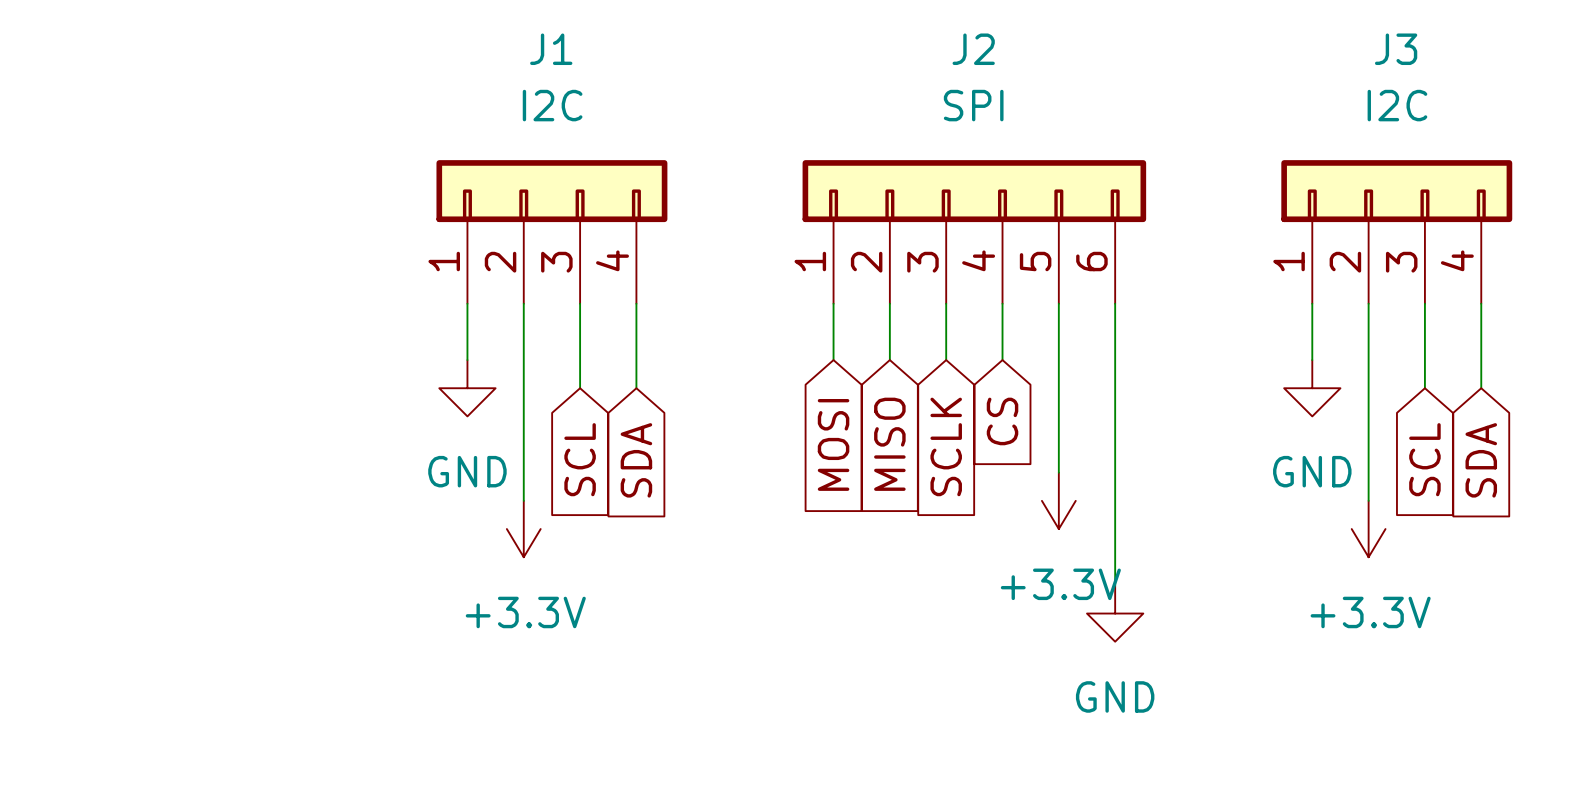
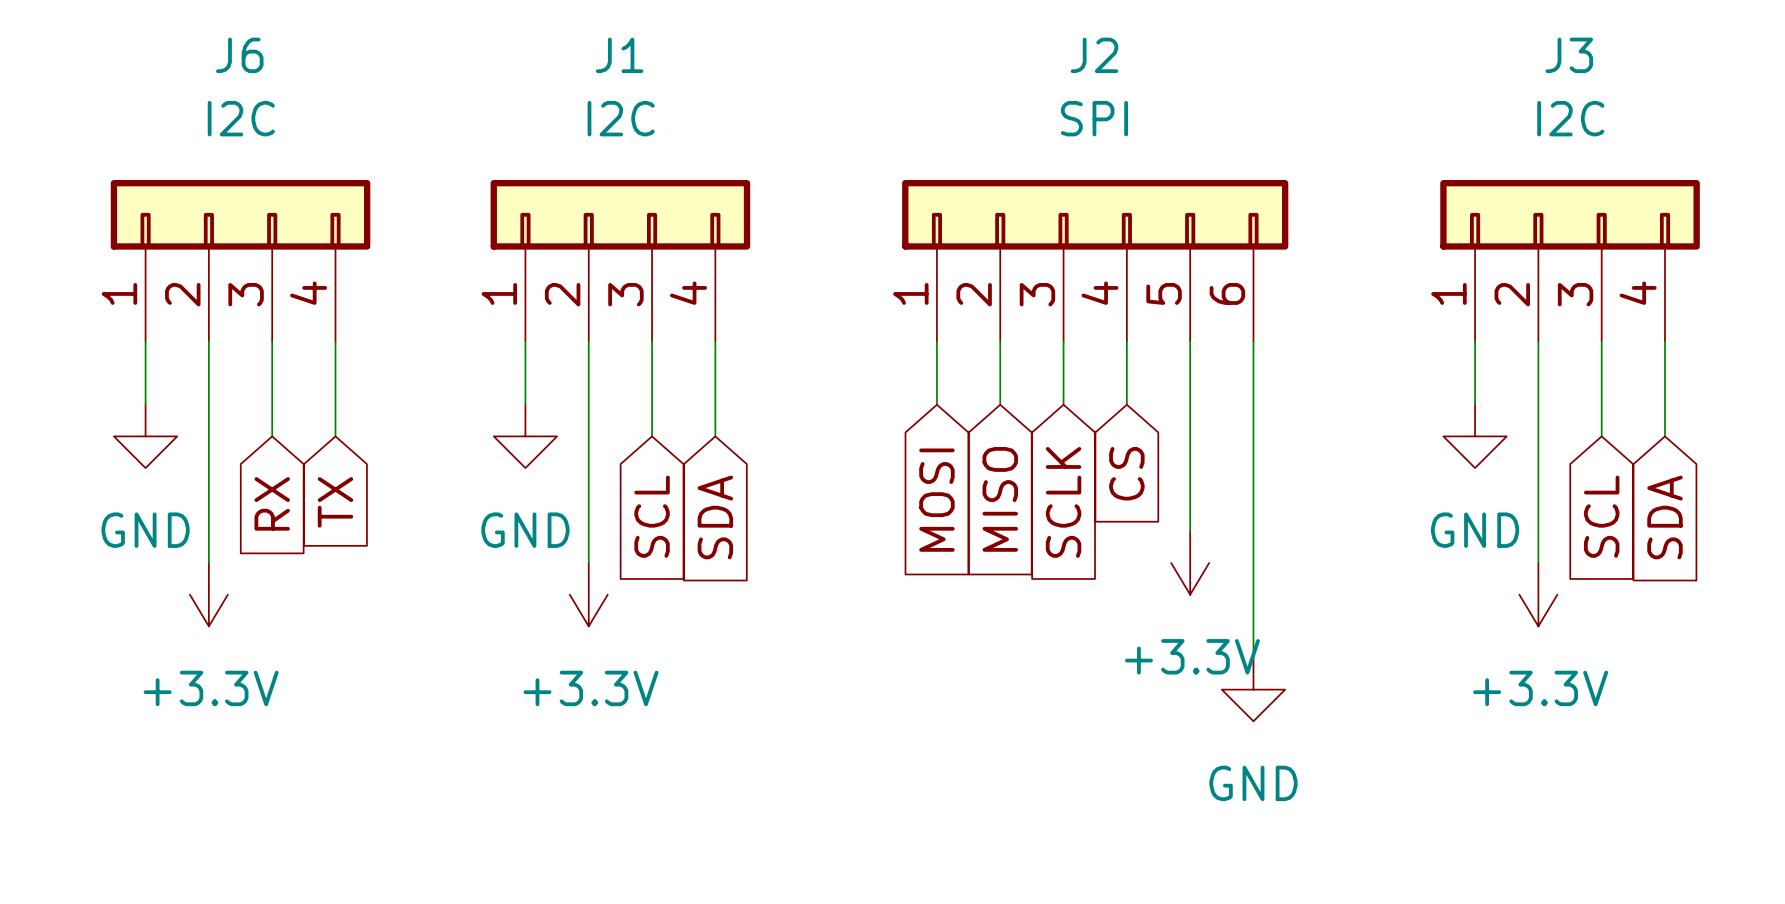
J6: none -> I2C (240, 260)
wire: none -> (145, 341) (145, 404)
wire: none -> (208, 341) (208, 563)
wire: none -> (272, 341) (272, 436)
wire: none -> (335, 341) (335, 436)
power symbol: none -> GND (145, 436)
global label: none -> TX (335, 502)
global label: none -> RX (272, 503)
power symbol: none -> +3.3V (208, 594)

